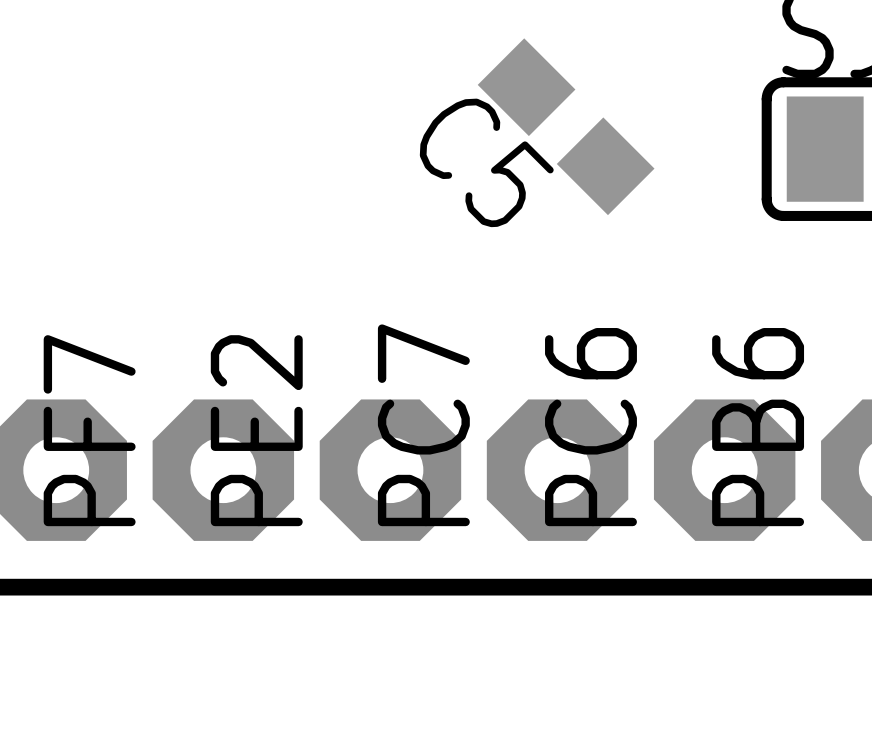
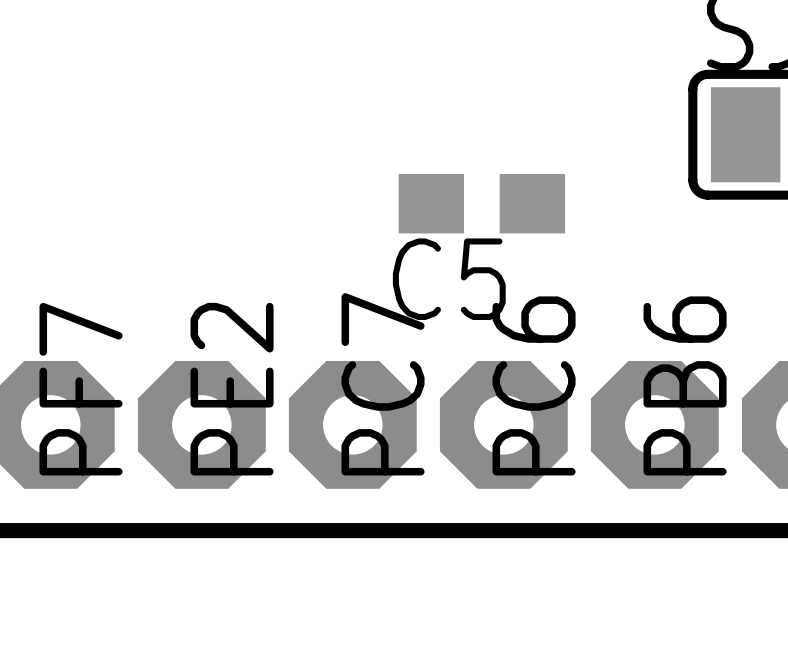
C5 rotation: 0° (566, 126) -> 45° counterclockwise (481, 203)

